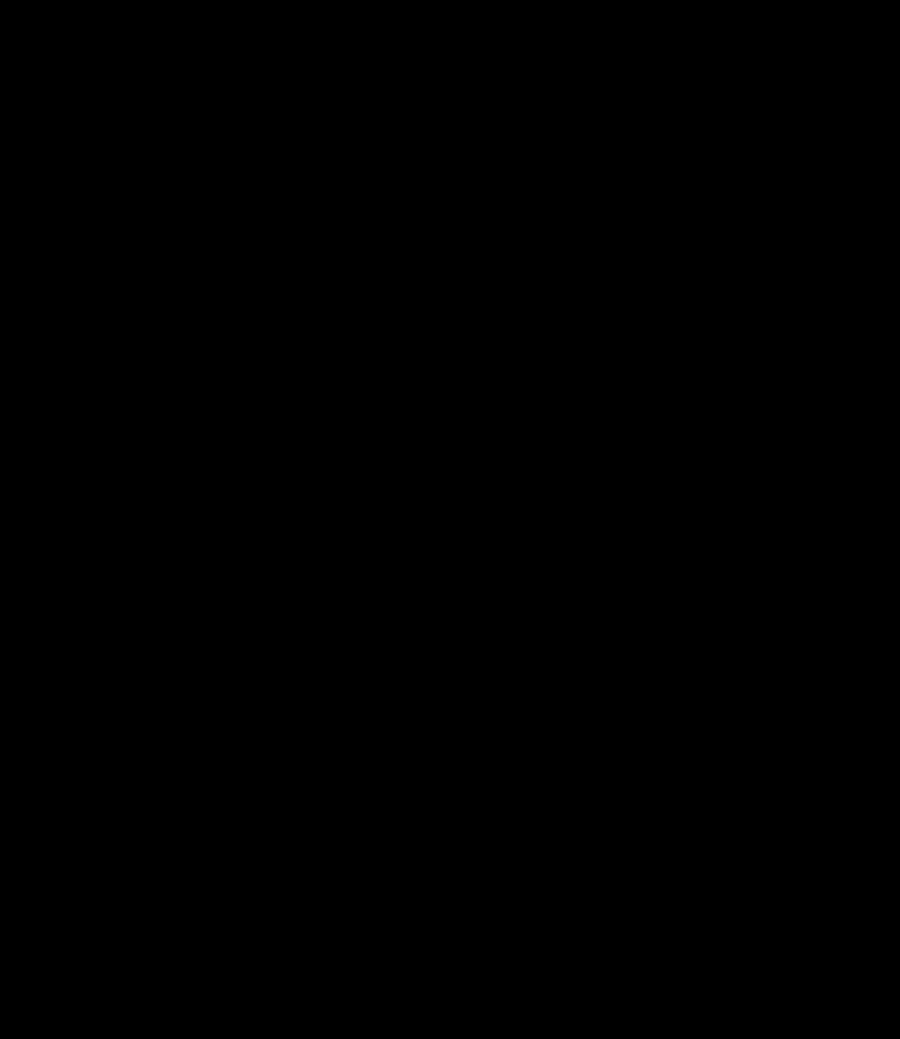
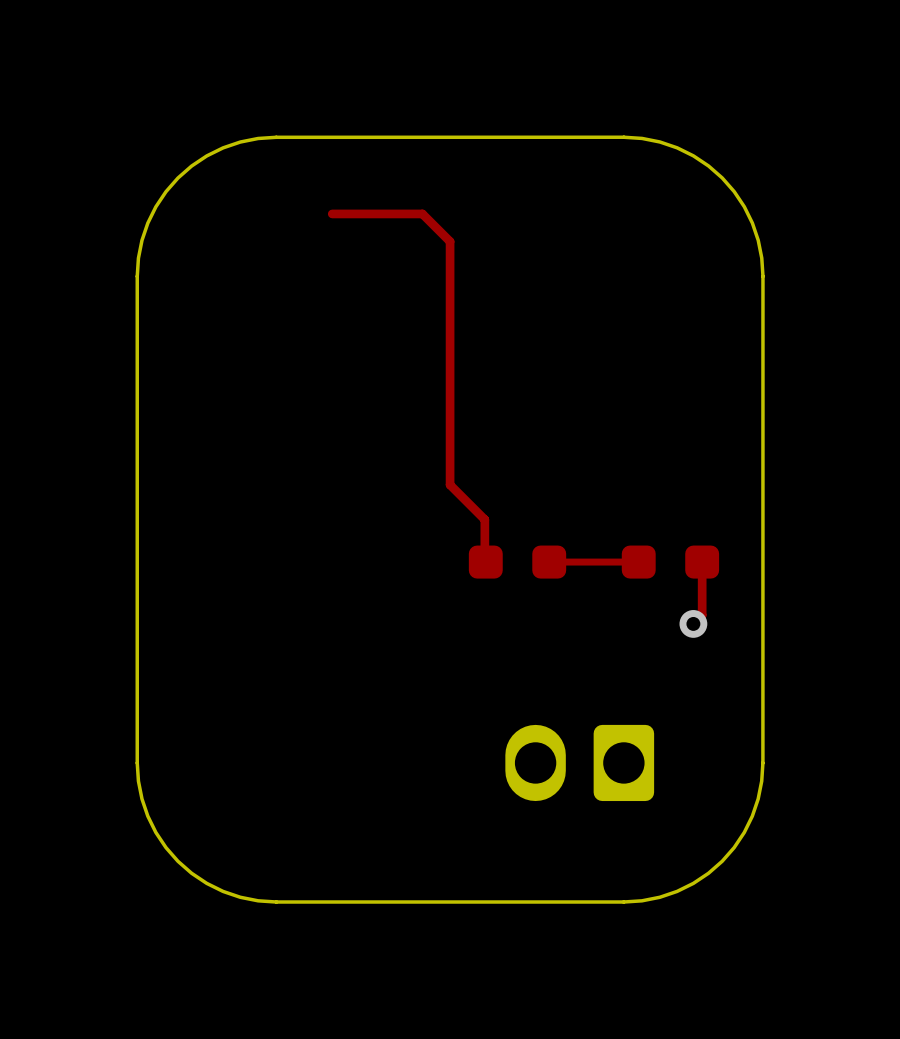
board edge: none -> (623, 137) (258, 138) (223, 147) (191, 166) (177, 178) (155, 206) (141, 240) (137, 276) (138, 781) (141, 798) (155, 832) (177, 861) (206, 883) (240, 897) (276, 902) (642, 900) (677, 891) (708, 873) (722, 861) (744, 832) (758, 798) (762, 762) (761, 258) (752, 223) (744, 206) (722, 177) (693, 155) (677, 147) (659, 141) (623, 137)
top track: none -> (332, 213) (422, 213) (450, 241) (450, 484) (484, 519) (485, 562)
part: none -> (517, 562)
top track: none -> (623, 562) (554, 562)
part: none -> (670, 562)
top track: none -> (702, 562) (702, 615) (693, 623)
via: none -> (693, 623)
part: none -> (579, 762)

